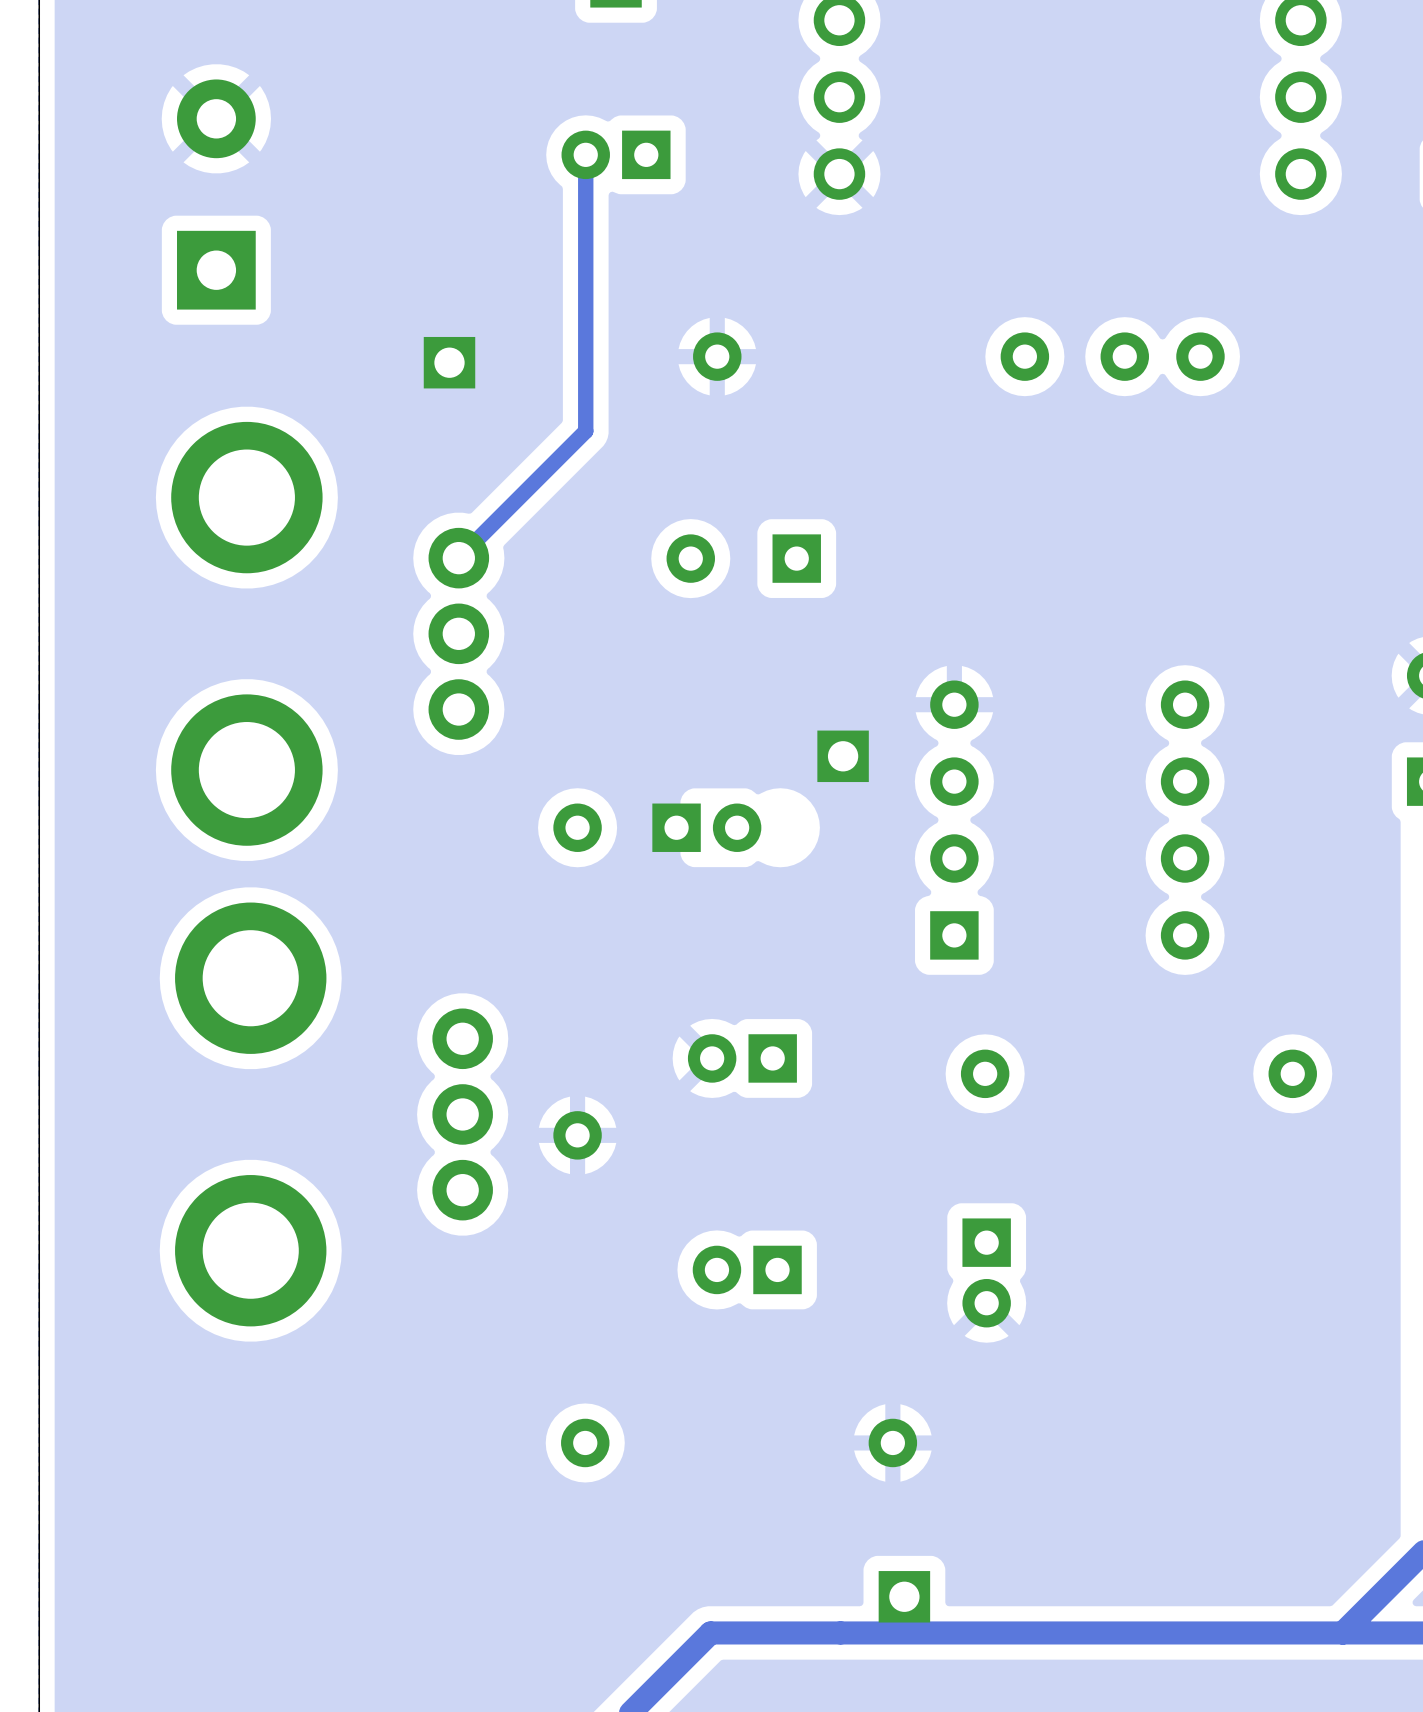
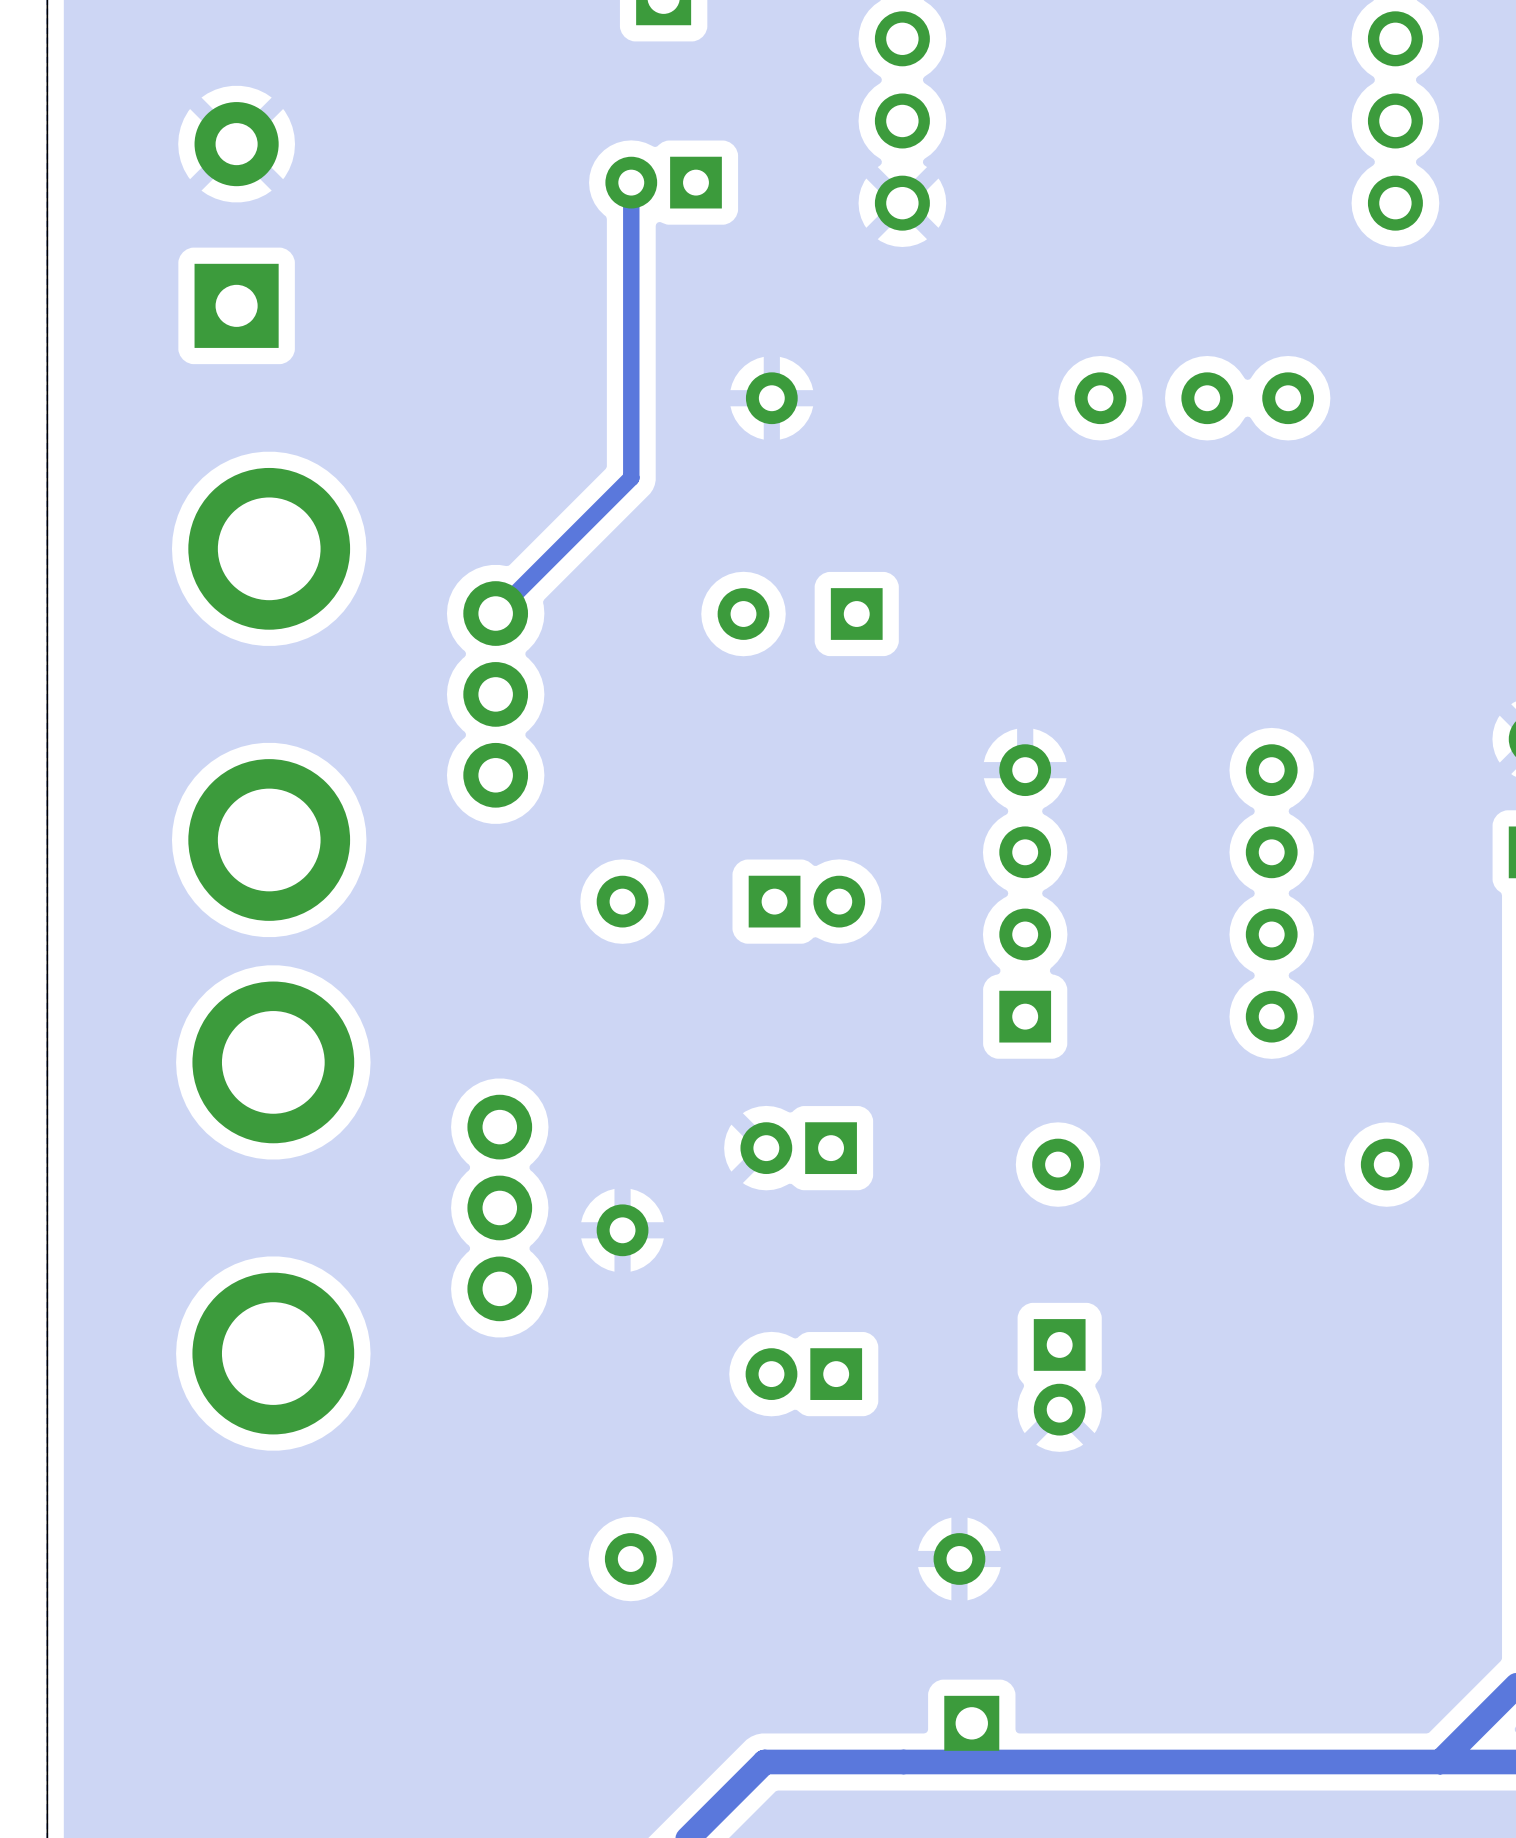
part: (449, 362) -> none
part: (843, 756) -> none
part position: (706, 827) -> (806, 901)

